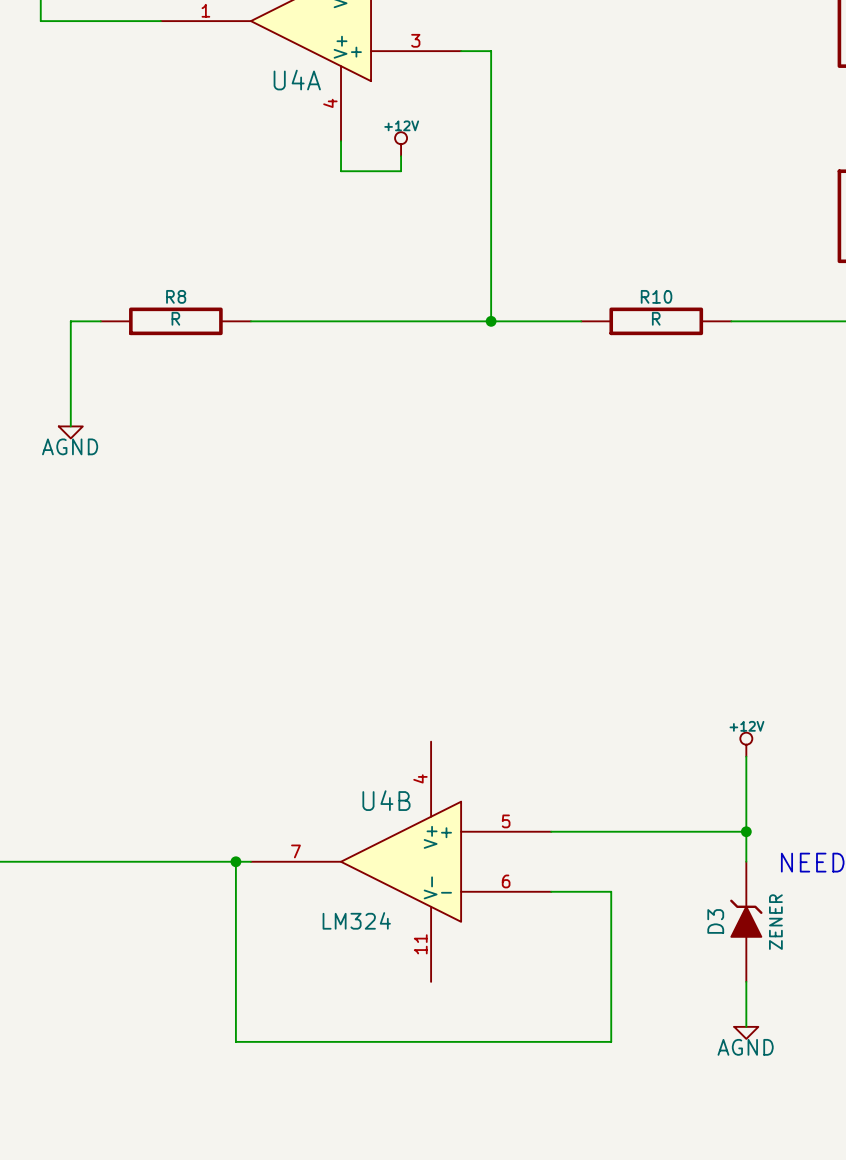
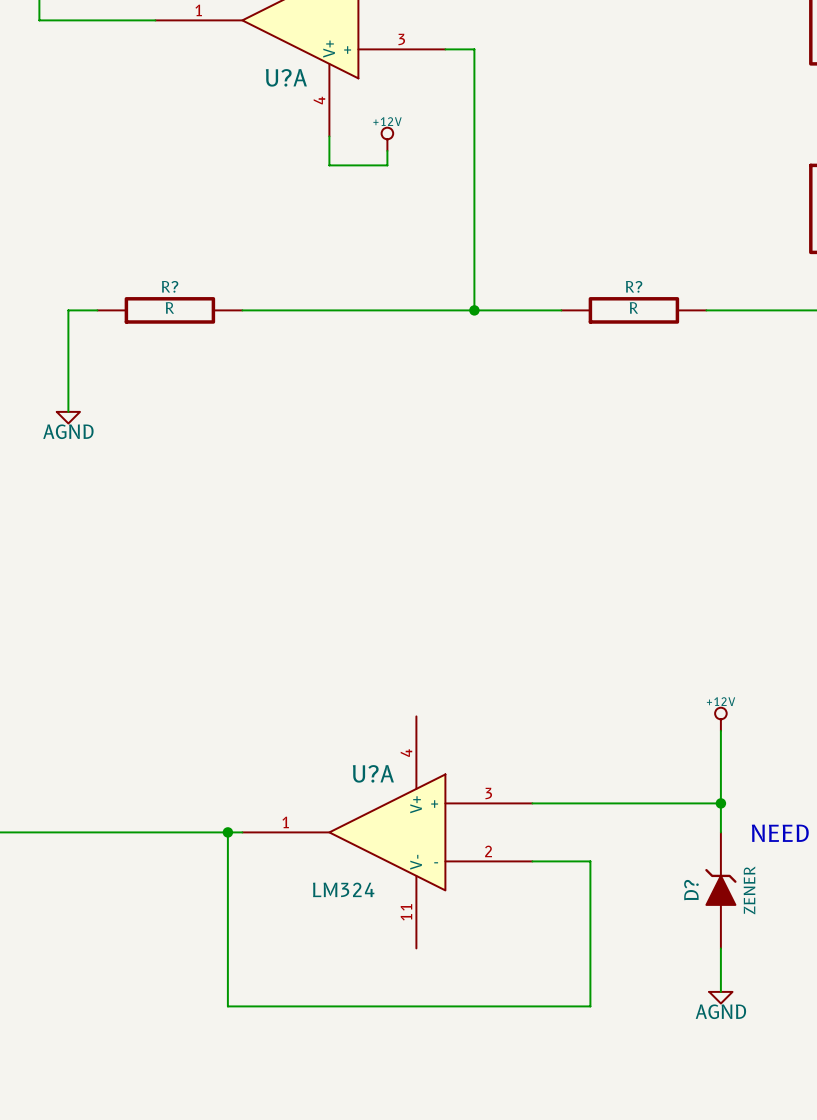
U4A name: U4A (297, 80) -> U?A (286, 77)
R8 name: R8 (176, 296) -> R? (170, 286)
R10 name: R10 (656, 296) -> R? (634, 286)
U4B name: U4B (386, 800) -> U?A (373, 773)
U4B pin number: 5 (506, 821) -> 3 (488, 793)
U4B pin number: 7 (295, 851) -> 1 (285, 822)
U4B pin number: 6 (506, 881) -> 2 (488, 851)
D3 name: D3 (715, 921) -> D? (691, 890)

